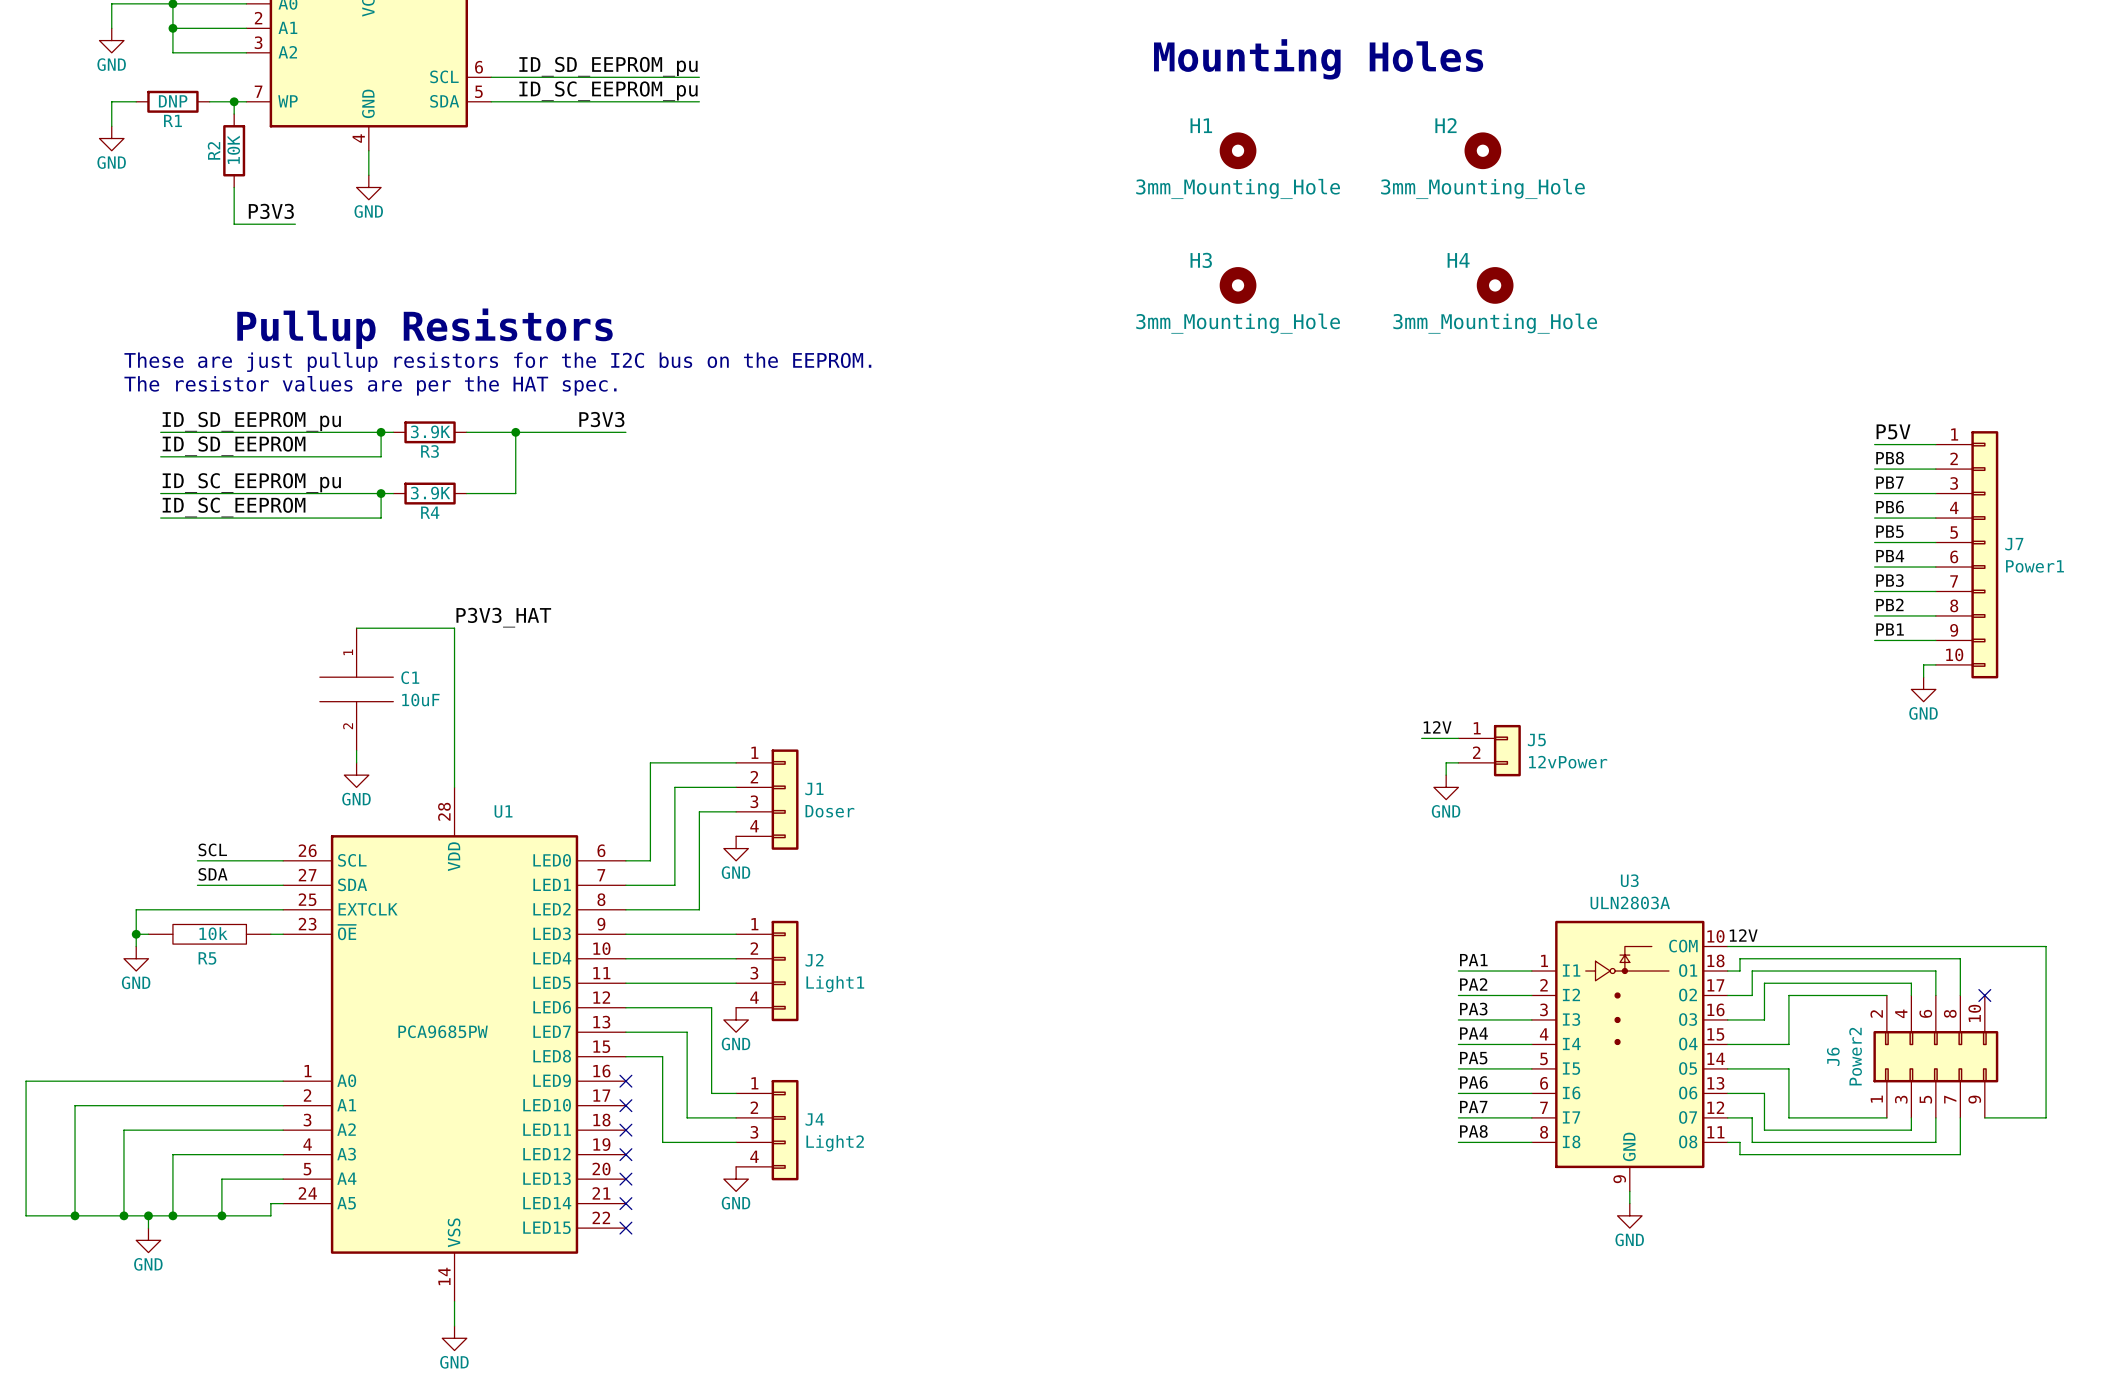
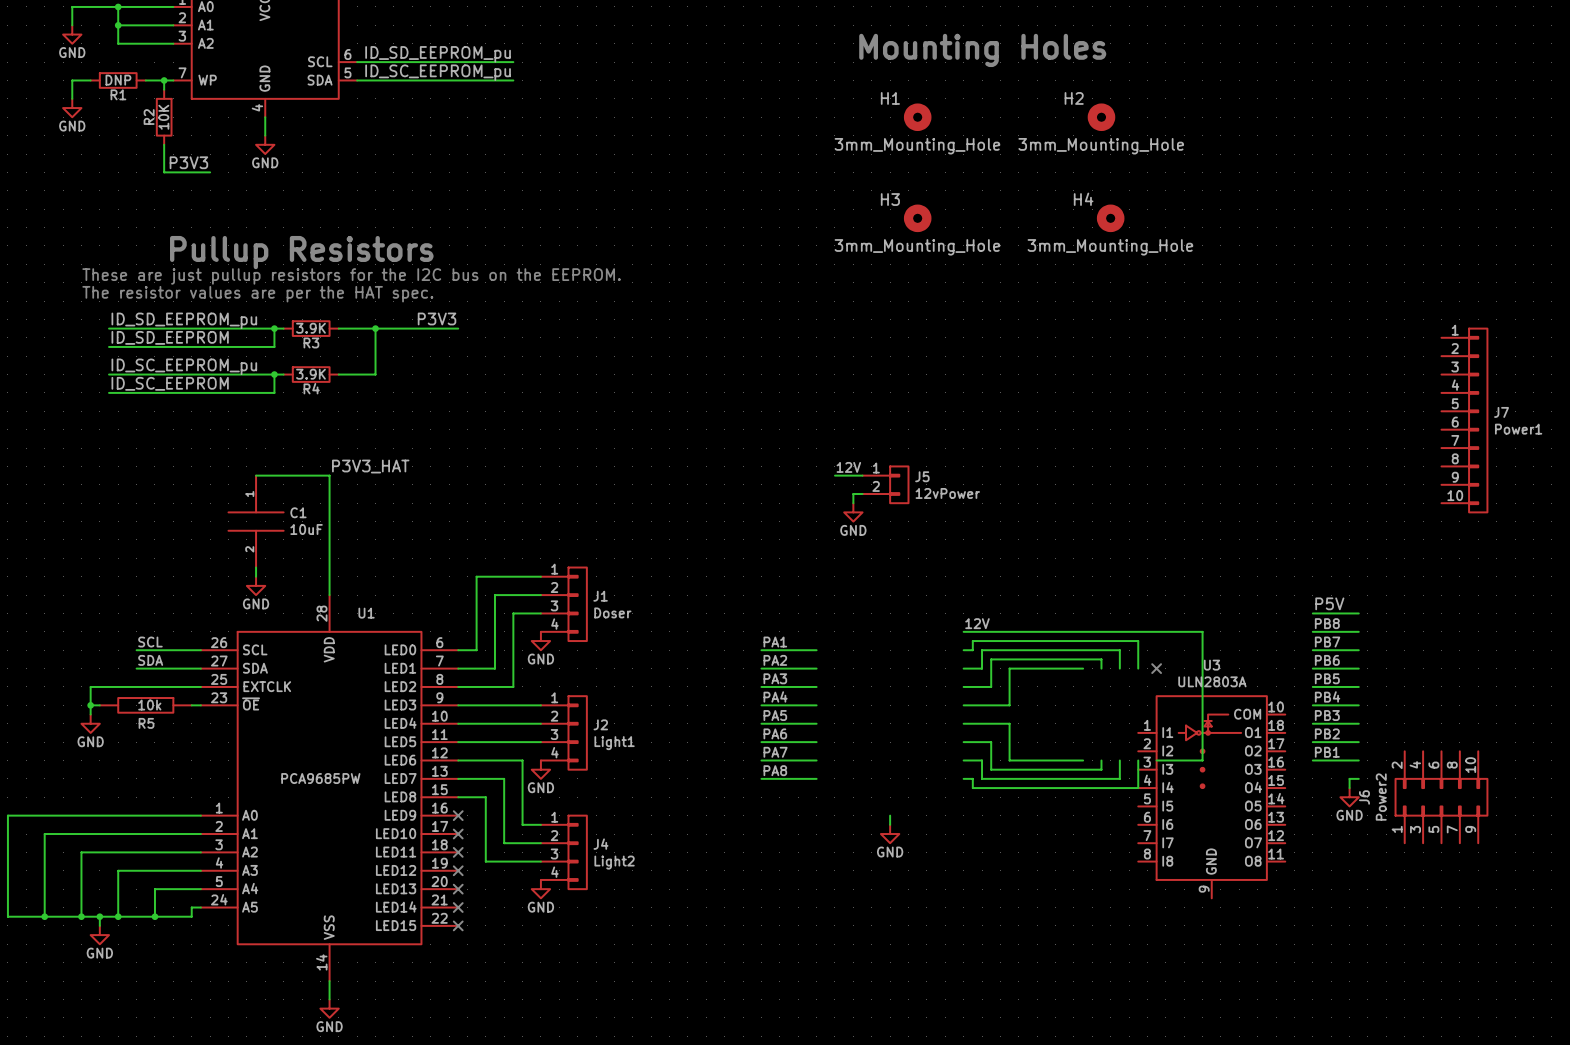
label: P5V (1893, 431) -> none
wire: (1874, 444) (1935, 444) -> none
label: PB8 (1890, 458) -> none
wire: (1874, 469) (1935, 469) -> none
label: PB7 (1889, 482) -> none
wire: (1874, 493) (1935, 493) -> none
label: PB6 (1890, 507) -> none
wire: (1874, 518) (1935, 518) -> none
label: PB5 (1889, 531) -> none
wire: (1874, 542) (1935, 542) -> none
label: PB4 (1890, 556) -> none
wire: (1874, 567) (1935, 567) -> none
label: PB3 (1889, 580) -> none
wire: (1874, 591) (1935, 591) -> none
label: PB2 (1889, 604) -> none
wire: (1874, 615) (1935, 615) -> (1312, 613) (1358, 613)
label: none -> 12V (848, 467)
wire: none -> (834, 475) (862, 475)
label: PB1 (1890, 629) -> none
wire: (1874, 640) (1935, 640) -> (1312, 631) (1358, 631)
wire: none -> (862, 494) (853, 494) (853, 503)
wire: (1935, 664) (1923, 664) (1923, 677) -> none
power symbol: none -> GND (853, 512)
power symbol: GND (1923, 689) -> none
label position: 12V (1437, 727) -> 12V (977, 623)
wire: (1421, 738) (1458, 738) -> none
J5 position: (1489, 750) -> (885, 484)
wire: (1458, 762) (1446, 762) (1446, 775) -> none
power symbol: GND (1446, 787) -> none
label: none -> P5V (1329, 603)
label: none -> PB8 (1327, 623)
wire: none -> (963, 631) (1202, 631) (1202, 760) (1156, 760)
label: none -> PA1 (775, 642)
label: none -> PB7 (1327, 642)
wire: none -> (761, 650) (816, 650)
wire: none -> (963, 650) (972, 650) (972, 641) (1138, 641) (1138, 668)
wire: none -> (1312, 650) (1358, 650)
label: none -> PA2 (775, 660)
label: none -> PB6 (1327, 660)
wire: none -> (761, 668) (816, 668)
wire: none -> (963, 668) (982, 668) (982, 650) (1119, 650) (1119, 668)
wire: none -> (1083, 668) (1009, 668) (1009, 705) (963, 705)
wire: none -> (1101, 668) (1101, 659) (991, 659) (991, 686) (963, 686)
no-connect mark: none -> (1156, 668)
wire: none -> (1312, 668) (1358, 668)
label: none -> PA3 (775, 678)
label: none -> PB5 (1327, 678)
wire: none -> (761, 686) (816, 686)
wire: none -> (1312, 686) (1358, 686)
label: none -> PA4 (775, 696)
label: none -> PB4 (1327, 696)
wire: none -> (761, 705) (816, 705)
wire: none -> (1312, 705) (1358, 705)
label: 12V (1743, 935) -> none
wire: (1727, 946) (2046, 946) (2046, 1117) (1984, 1117) -> none
label: none -> PA5 (775, 715)
label: none -> PB3 (1327, 715)
wire: none -> (761, 723) (816, 723)
wire: none -> (963, 723) (1009, 723) (1009, 760) (1083, 760)
wire: (1764, 958) (1739, 958) (1739, 971) (1727, 971) -> none
wire: (1825, 958) (1960, 958) (1960, 995) -> none
label: PA1 (1473, 960) -> none
wire: (1458, 971) (1531, 971) -> none
label: none -> PA6 (775, 733)
label: none -> PB2 (1327, 733)
wire: none -> (761, 742) (816, 742)
wire: none -> (963, 742) (991, 742) (991, 769) (1083, 769)
wire: (1764, 983) (1764, 1019) (1727, 1019) -> none
wire: (1825, 983) (1911, 983) (1911, 995) -> none
label: PA2 (1473, 984) -> none
wire: (1458, 995) (1531, 995) -> none
wire: (1727, 995) (1752, 995) (1752, 971) (1935, 971) (1935, 995) -> none
wire: (1886, 995) (1788, 995) (1788, 1044) (1727, 1044) -> none
no-connect mark: (1984, 995) -> none
label: none -> PA7 (775, 752)
label: none -> PB1 (1327, 752)
wire: none -> (761, 760) (816, 760)
wire: none -> (963, 760) (982, 760) (982, 778) (1119, 778) (1119, 760)
wire: none -> (1138, 760) (1138, 788)
wire: none -> (1312, 760) (1358, 760)
label: PA3 (1473, 1009) -> none
wire: (1482, 1019) (1531, 1019) -> (1101, 769) (1101, 760)
label: none -> PA8 (775, 770)
wire: none -> (761, 778) (816, 778)
wire: none -> (963, 778) (972, 778) (972, 788) (1083, 788)
wire: none -> (1358, 778) (1349, 778) (1349, 788)
label: PA4 (1473, 1033) -> none
power symbol: none -> GND (1349, 797)
label: PA5 (1473, 1058) -> none
wire: (1458, 1068) (1531, 1068) -> none
wire: (1727, 1068) (1788, 1068) (1788, 1117) (1886, 1117) -> none
wire: none -> (890, 815) (890, 824)
label: PA6 (1473, 1082) -> none
wire: (1458, 1093) (1531, 1093) -> none
wire: (1727, 1093) (1764, 1093) (1764, 1130) (1911, 1130) (1911, 1117) -> none
power symbol: none -> GND (890, 834)
label: PA7 (1473, 1106) -> none
wire: (1458, 1117) (1531, 1117) -> none
wire: (1727, 1117) (1752, 1117) (1752, 1142) (1935, 1142) (1935, 1117) -> none
wire: (1960, 1117) (1960, 1154) (1739, 1154) (1739, 1142) (1727, 1142) -> none
label: PA8 (1473, 1131) -> none
wire: (1458, 1142) (1531, 1142) -> none
wire: (1629, 1191) (1629, 1203) -> none
power symbol: GND (1629, 1215) -> none

